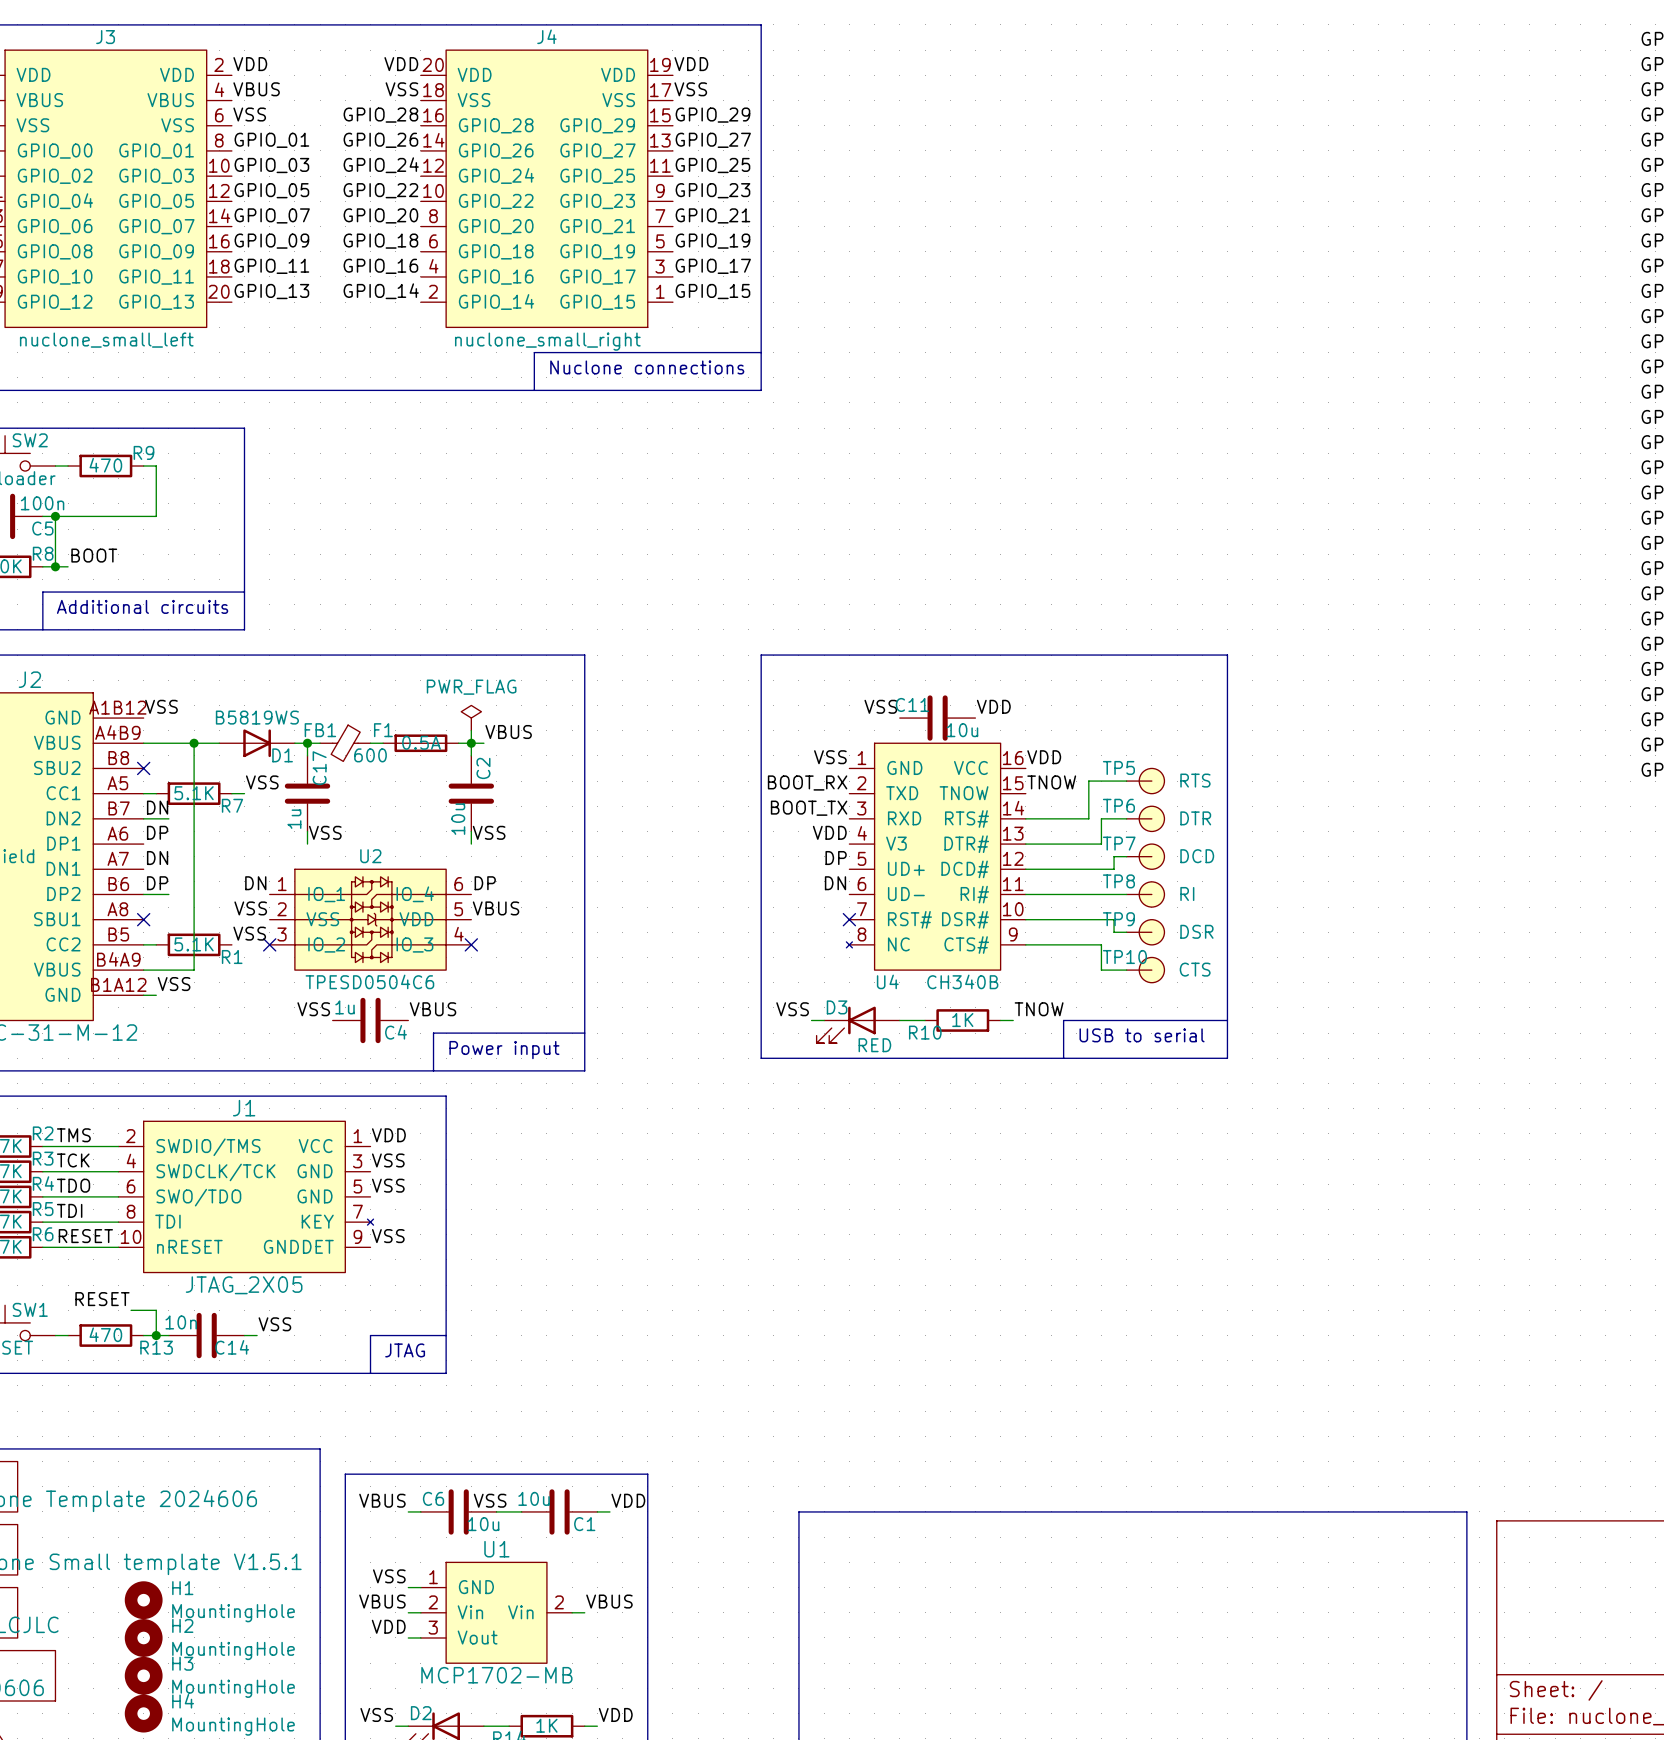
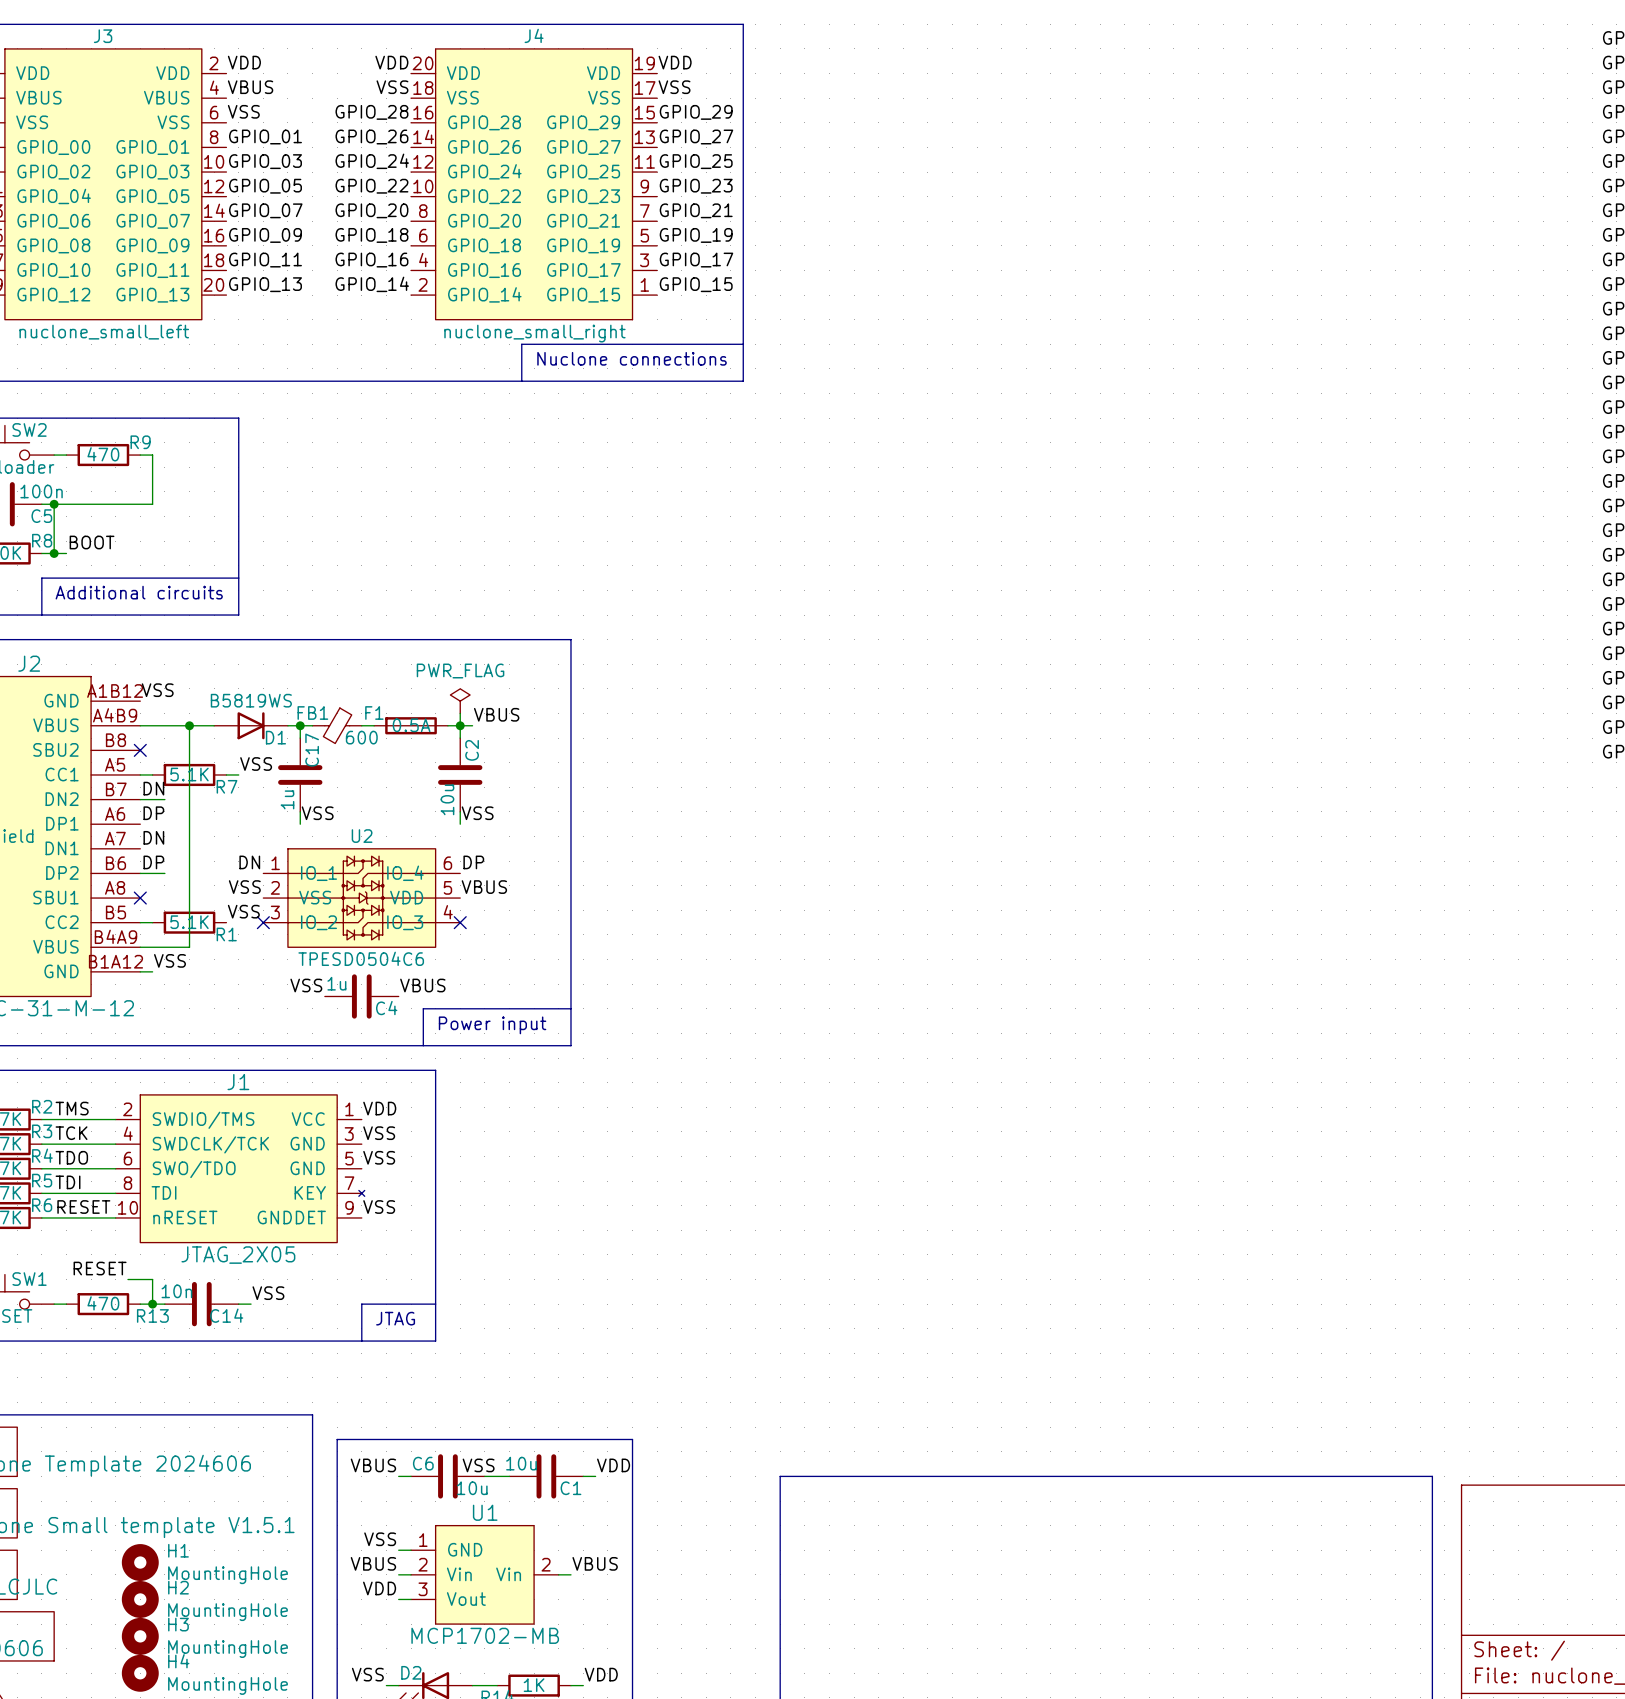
line: (761, 655) (1227, 655) (1227, 1058) (761, 1058) (761, 655) -> none
label: VSS (880, 706) -> none
label: VDD (993, 706) -> none
C11: 10u (937, 718) -> none
label: VSS (830, 757) -> none
label: VDD (1044, 757) -> none
wire: (1126, 781) (1088, 781) (1088, 818) (1025, 818) -> none
TP5: RTS (1145, 781) -> none
label: TNOW (1051, 782) -> none
label: BOOT_RX (807, 783) -> none
label: BOOT_TX (809, 808) -> none
wire: (1126, 818) (1101, 818) (1101, 844) (1025, 844) -> none
TP6: DTR (1145, 818) -> none
label: VDD (829, 832) -> none
U4: CH340B (936, 856) -> none
wire: (1126, 856) (1114, 856) (1114, 869) (1025, 869) -> none
TP7: DCD (1145, 856) -> none
label: DP (836, 858) -> none
label: DN (835, 883) -> none
wire: (1025, 894) (1126, 894) -> none
TP8: RI (1145, 894) -> none
no-connect mark: (849, 919) -> none
wire: (1025, 919) (1114, 919) (1114, 932) (1126, 932) -> none
TP9: DSR (1145, 932) -> none
wire: (1025, 944) (1101, 944) (1101, 970) (1126, 970) -> none
TP10: CTS (1145, 970) -> none
label: VSS (792, 1009) -> none
label: TNOW (1039, 1009) -> none
wire: (811, 1020) (824, 1020) -> none
wire: (899, 1020) (925, 1020) -> none
R10: 1K (962, 1020) -> none
wire: (1000, 1020) (1013, 1020) -> none
line: (1227, 1020) (1063, 1020) (1063, 1058) -> none
D3: RED (858, 1024) -> none
text: USB to serial (1142, 1035) -> none

